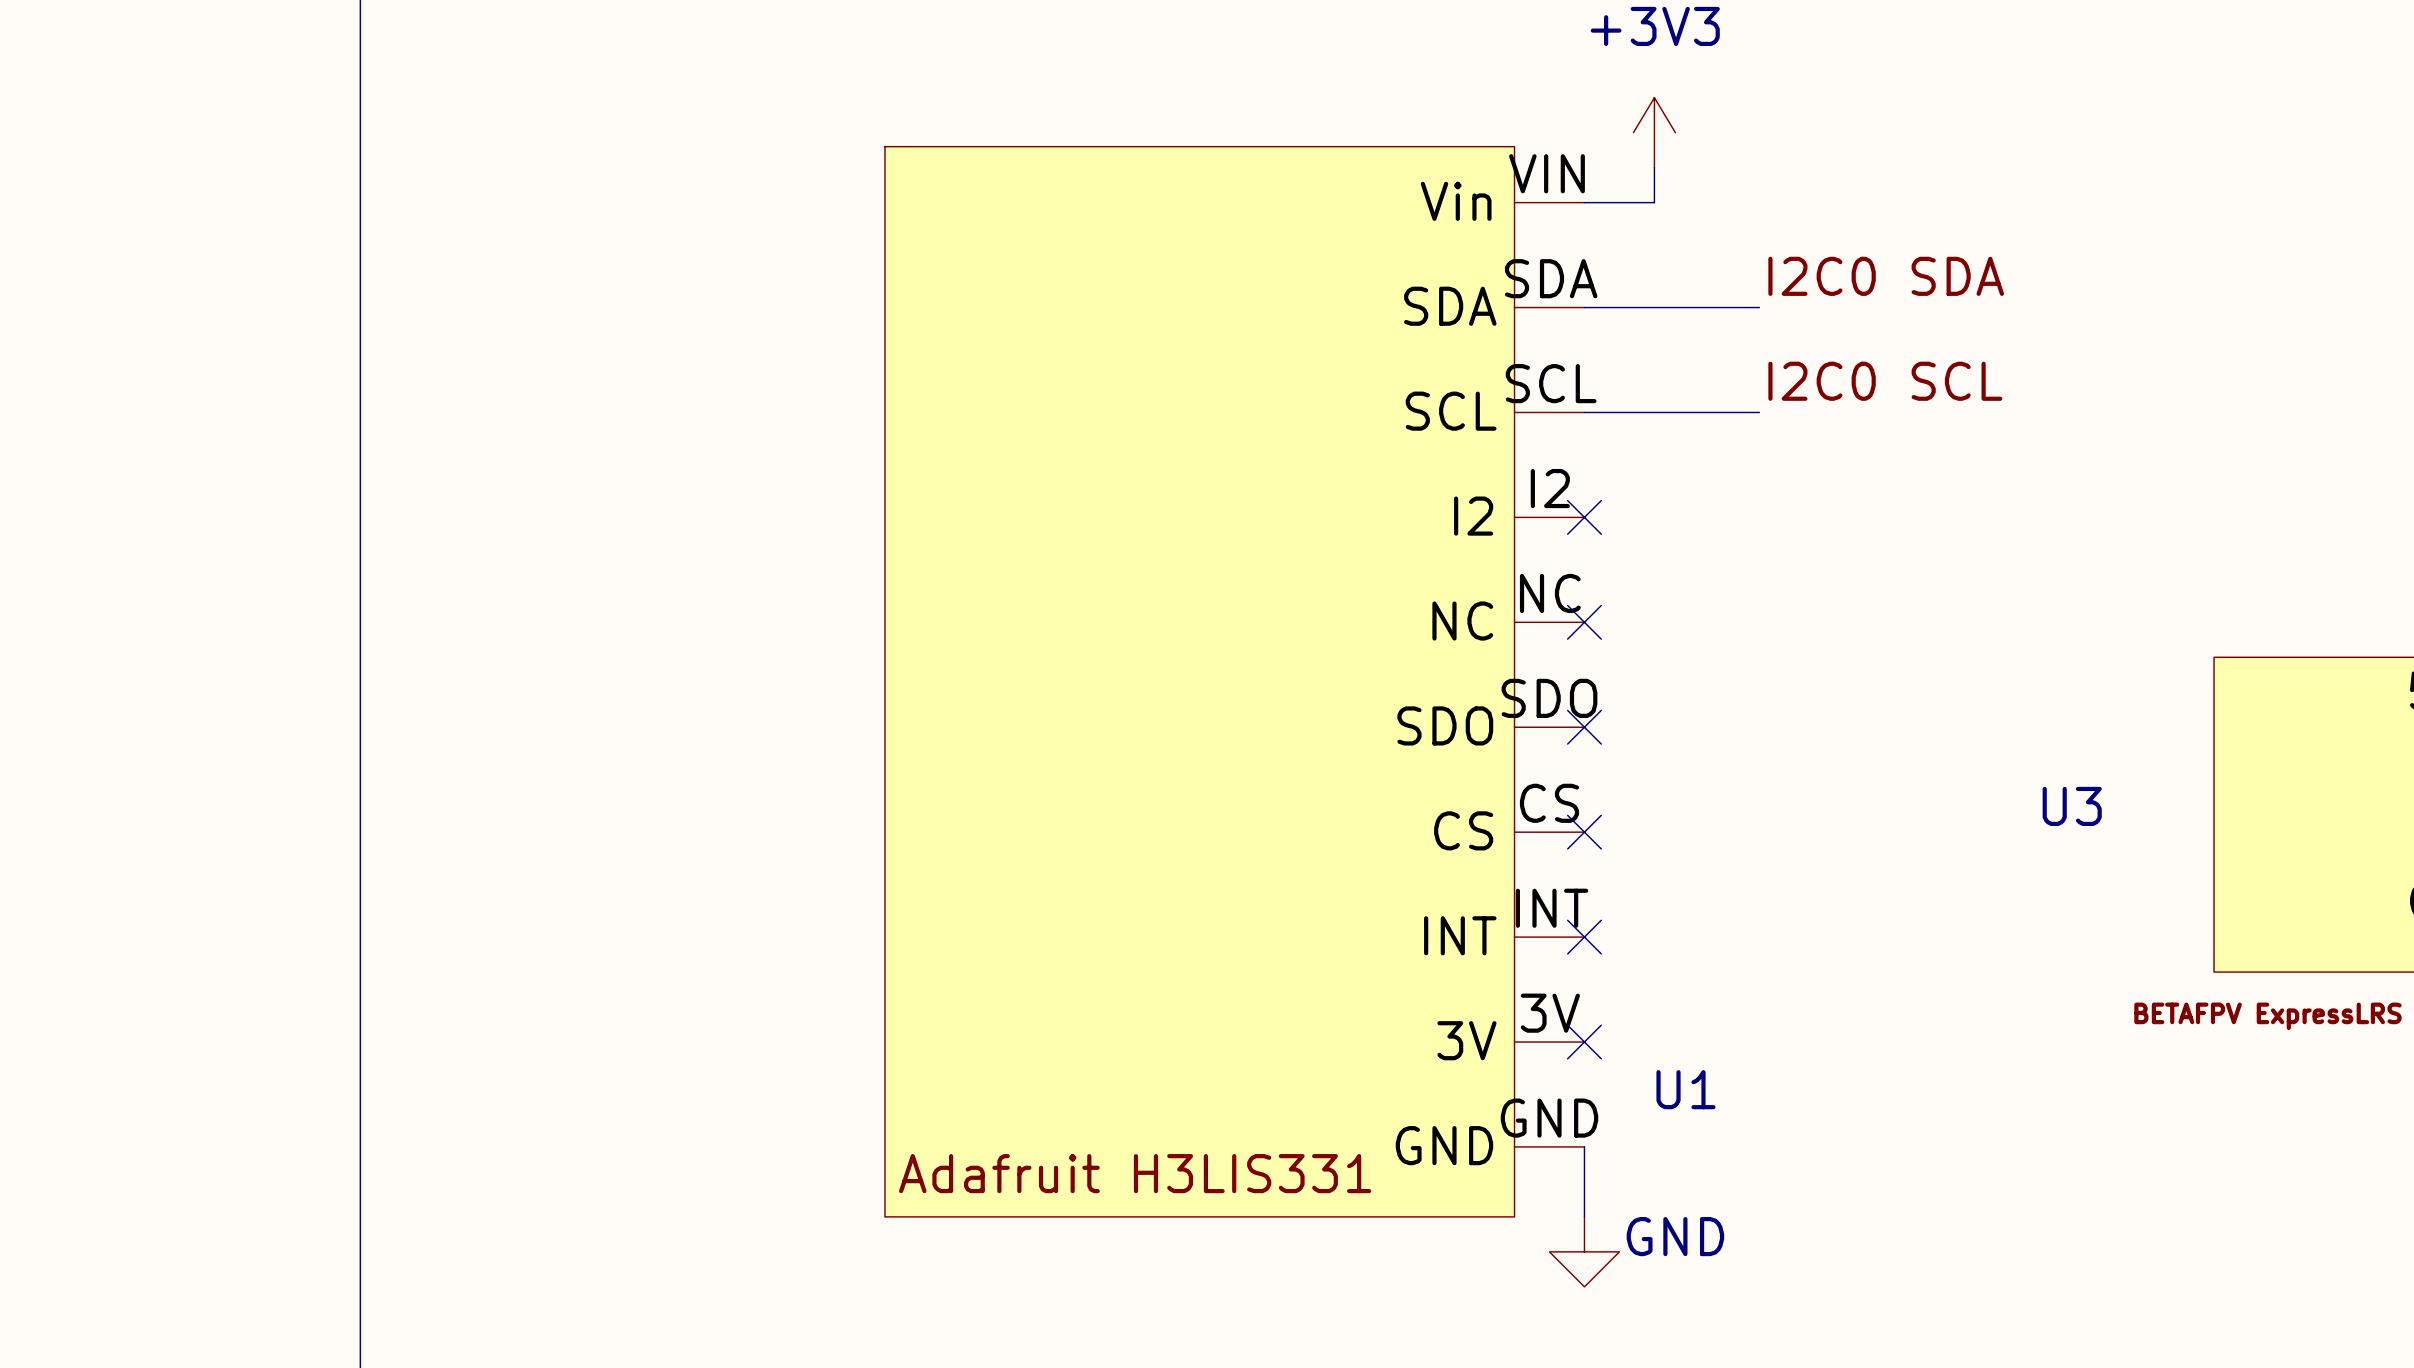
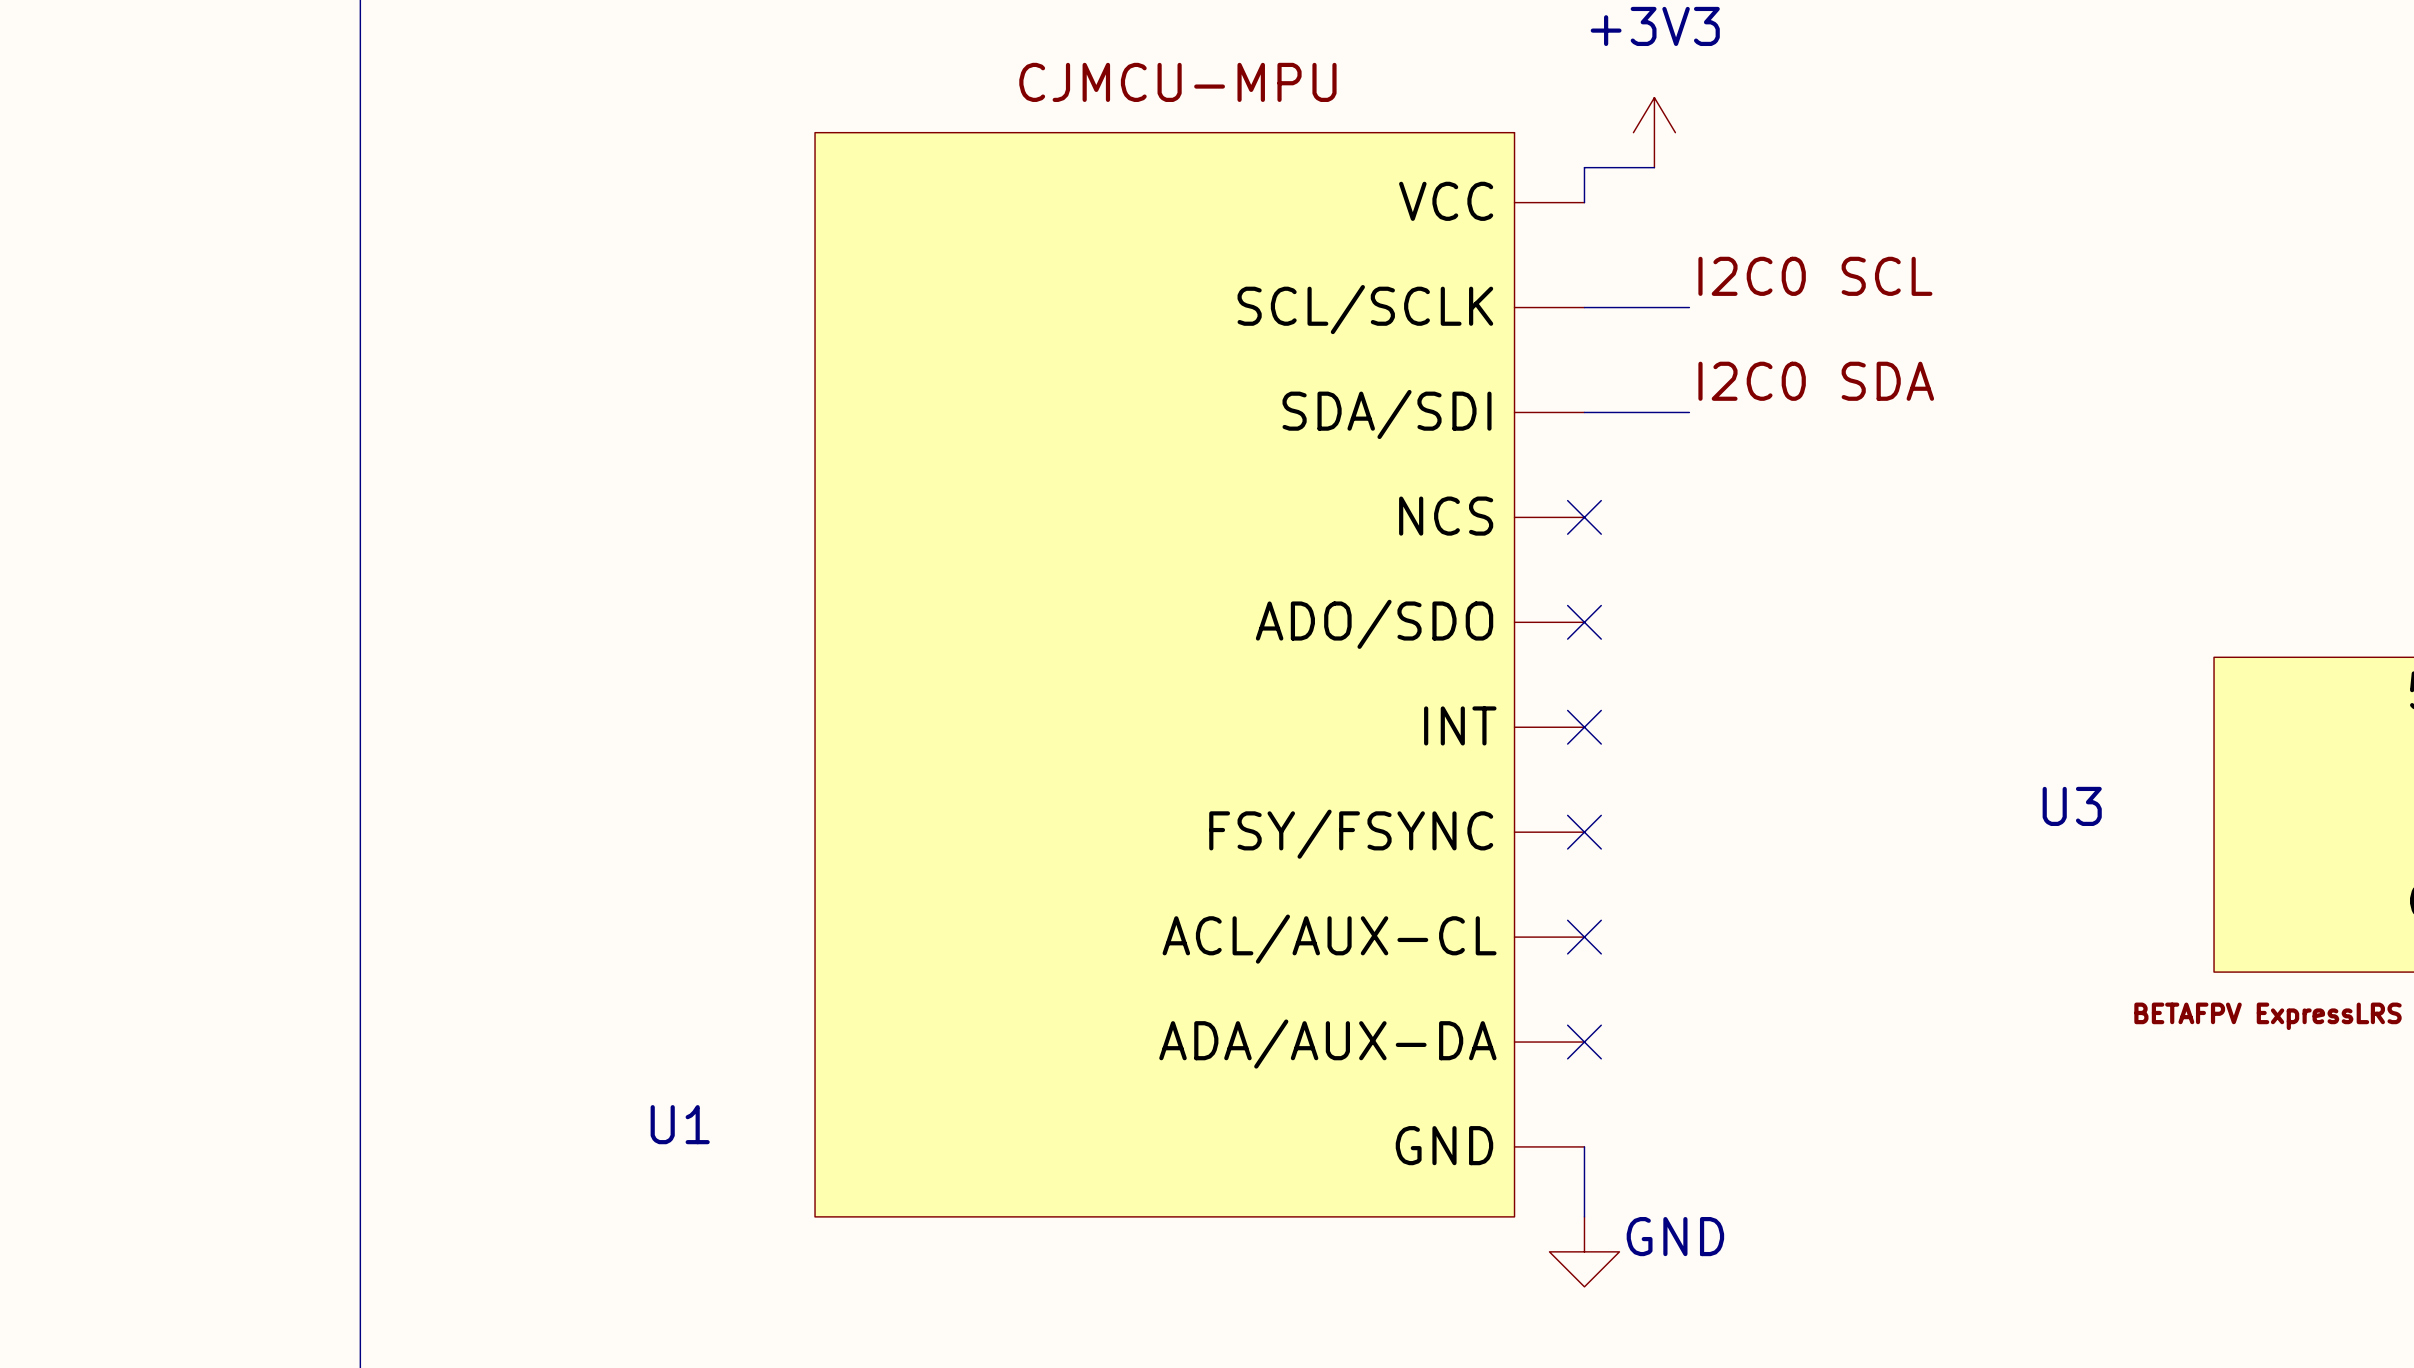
U1 symbol: [884, 146, 1585, 1217] -> [815, 132, 1585, 1217]
wire: (1654, 167) (1654, 202) (1584, 202) -> (1654, 167) (1584, 167) (1584, 202)
label position: I2C0 SDA (1886, 276) -> I2C0 SDA (1816, 381)
wire: (1689, 307) (1759, 307) -> none
label position: I2C0 SCL (1885, 381) -> I2C0 SCL (1815, 276)
wire: (1689, 412) (1759, 412) -> none
U1 name position: U1 (1685, 1089) -> U1 (680, 1124)

